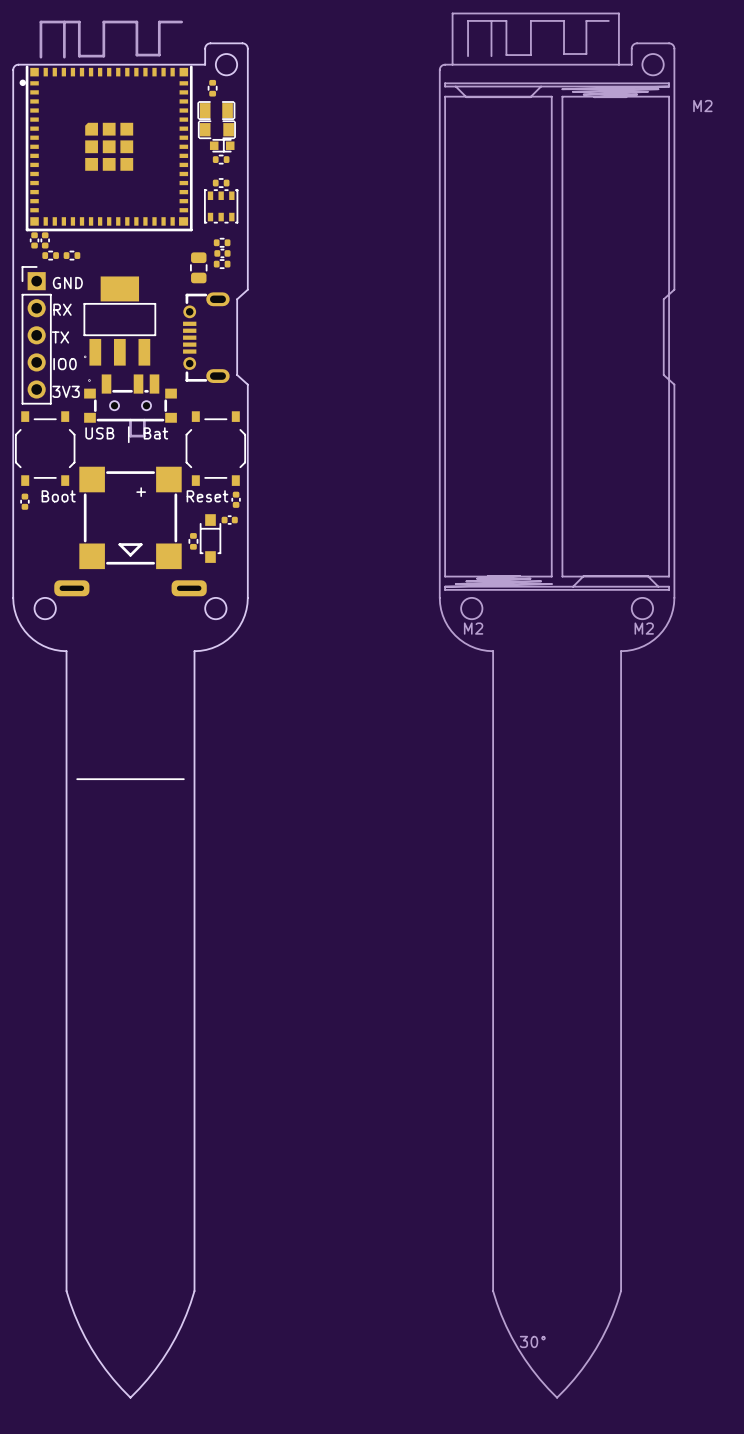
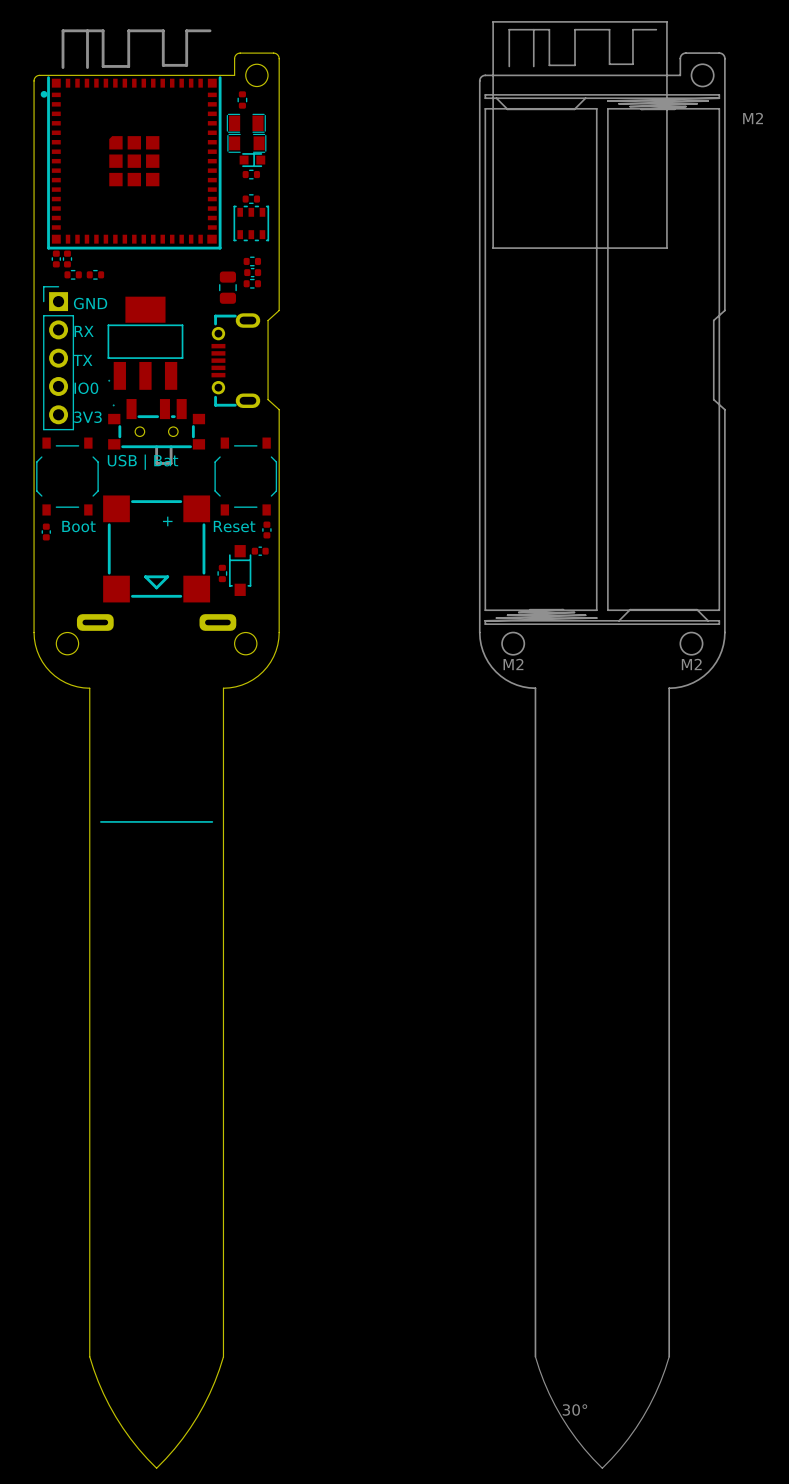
line: none -> (493, 75) (493, 248) (666, 248) (666, 75)

